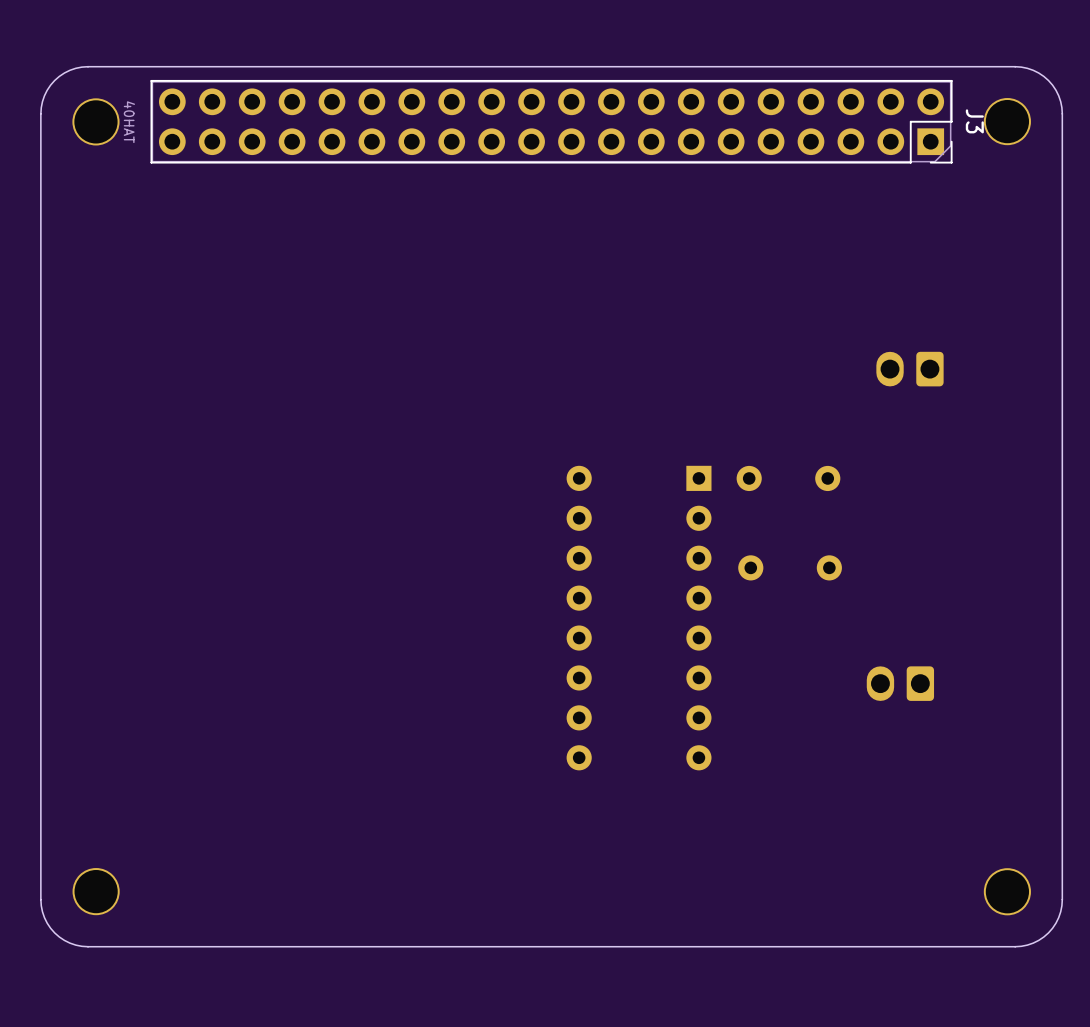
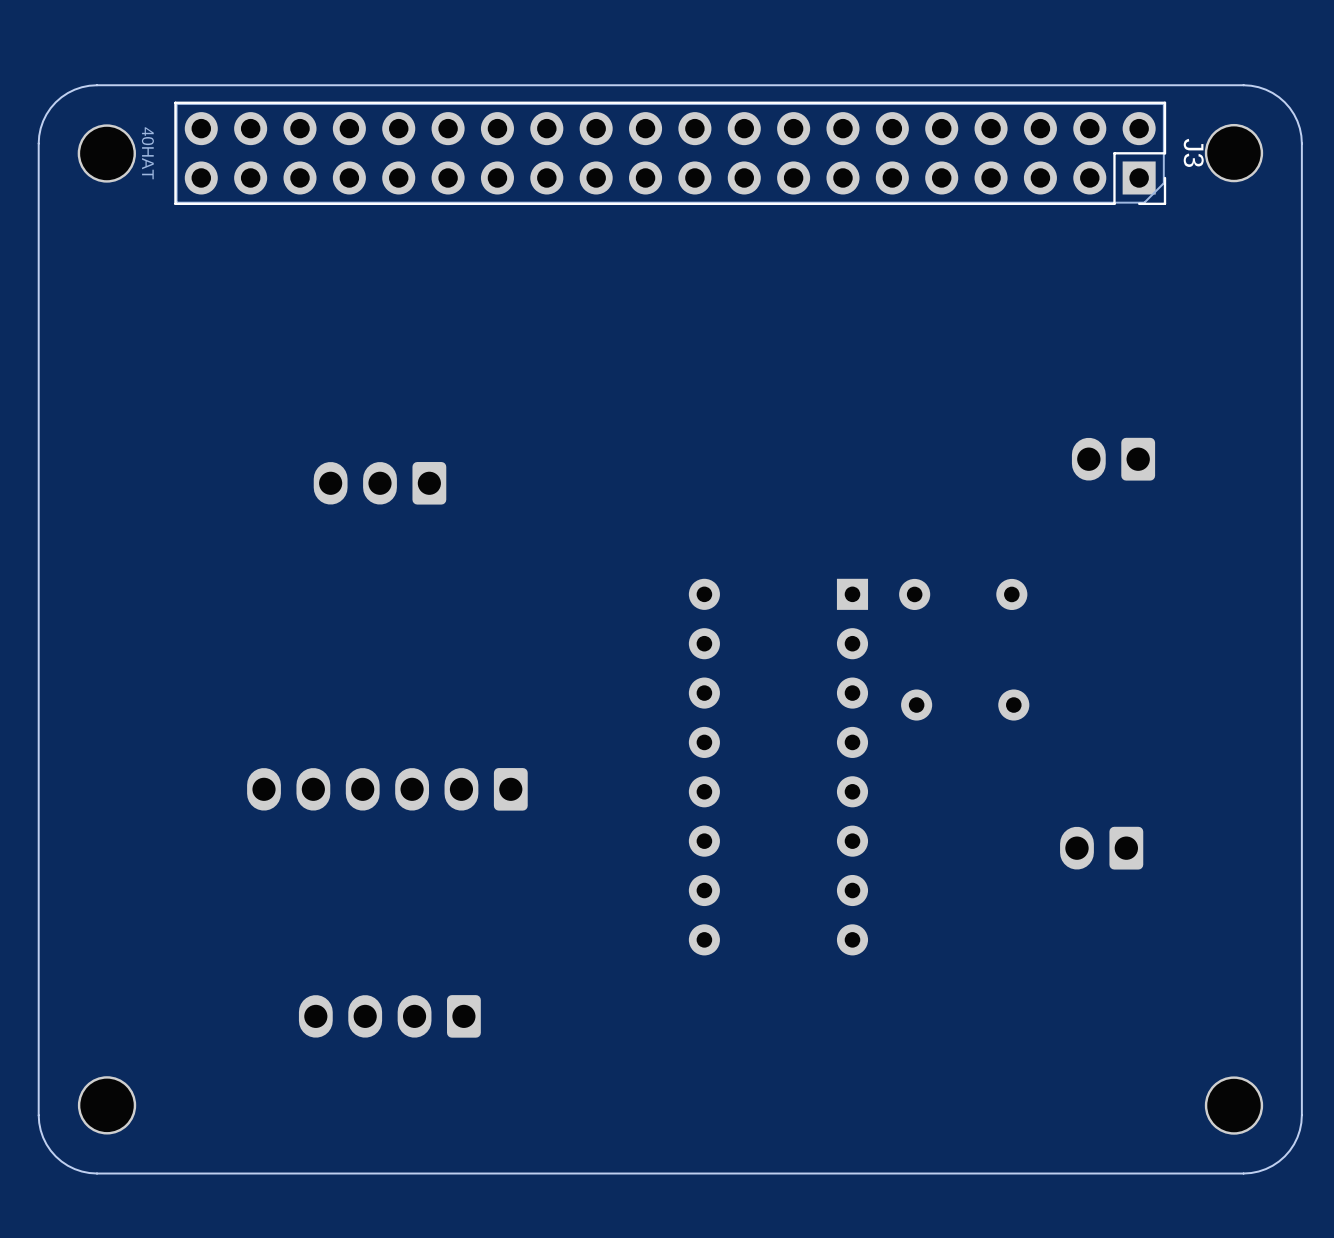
part: none -> (380, 483)
part: none -> (387, 789)
part: none -> (389, 1016)

